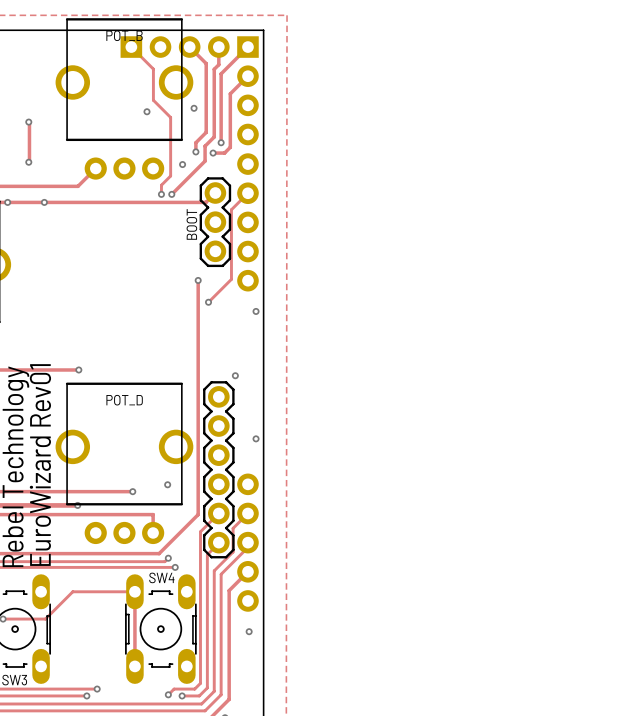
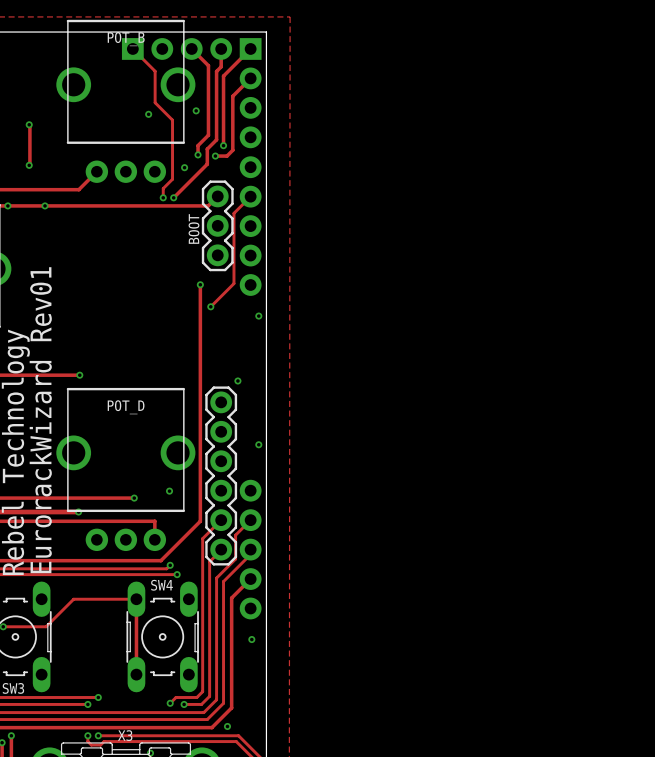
text: EuroWizard Rev01 (40, 465) -> EurorackWizard Rev01 (40, 420)

